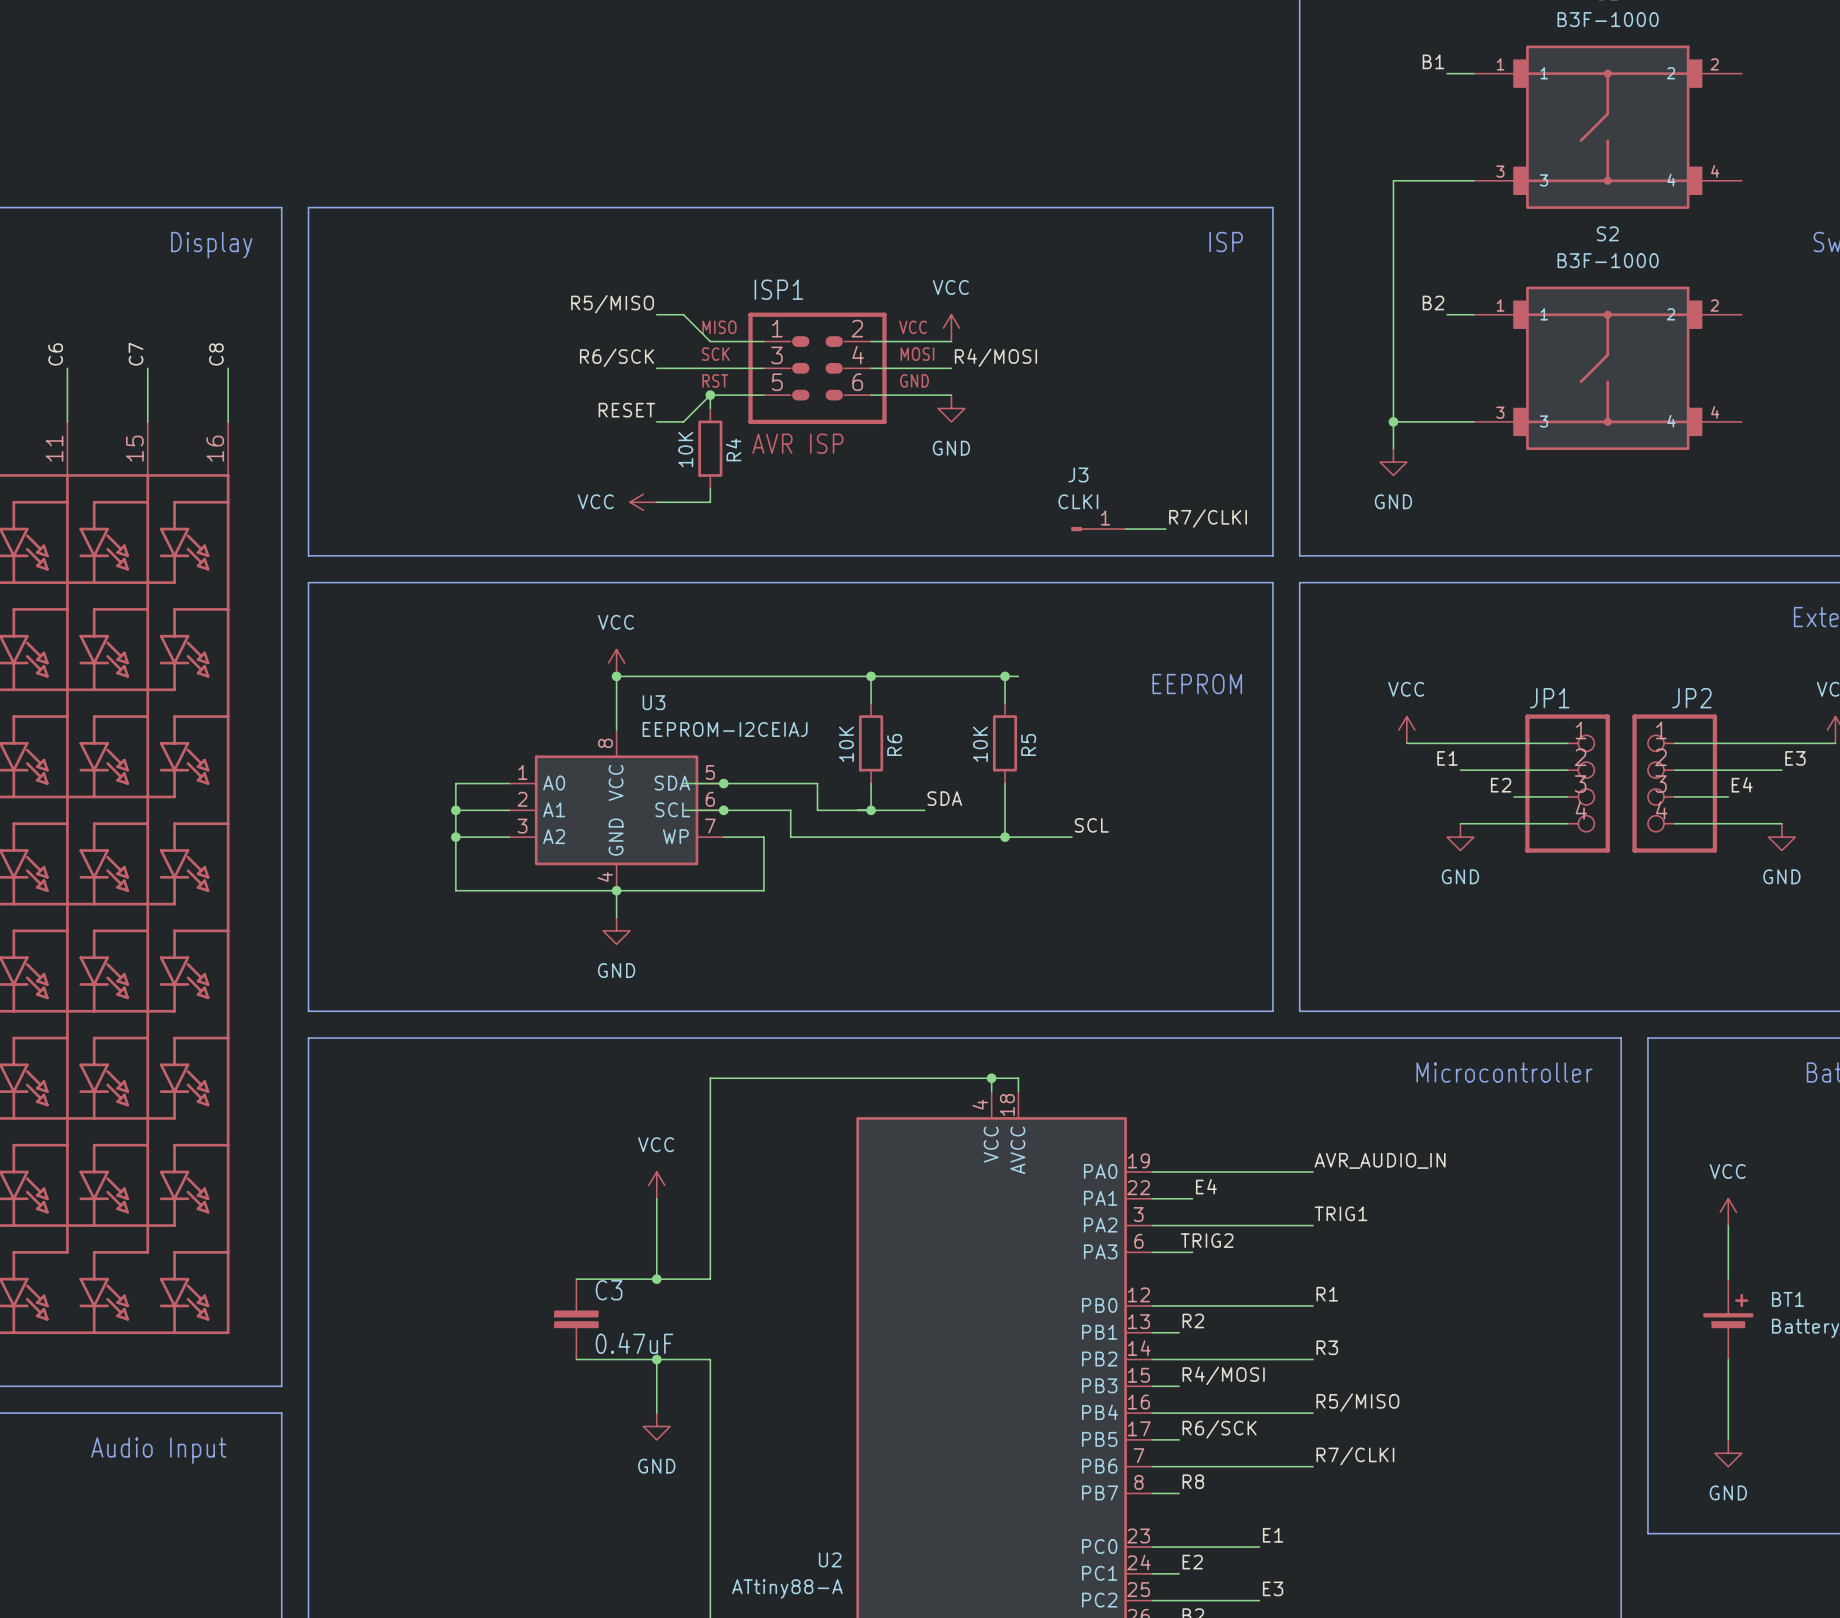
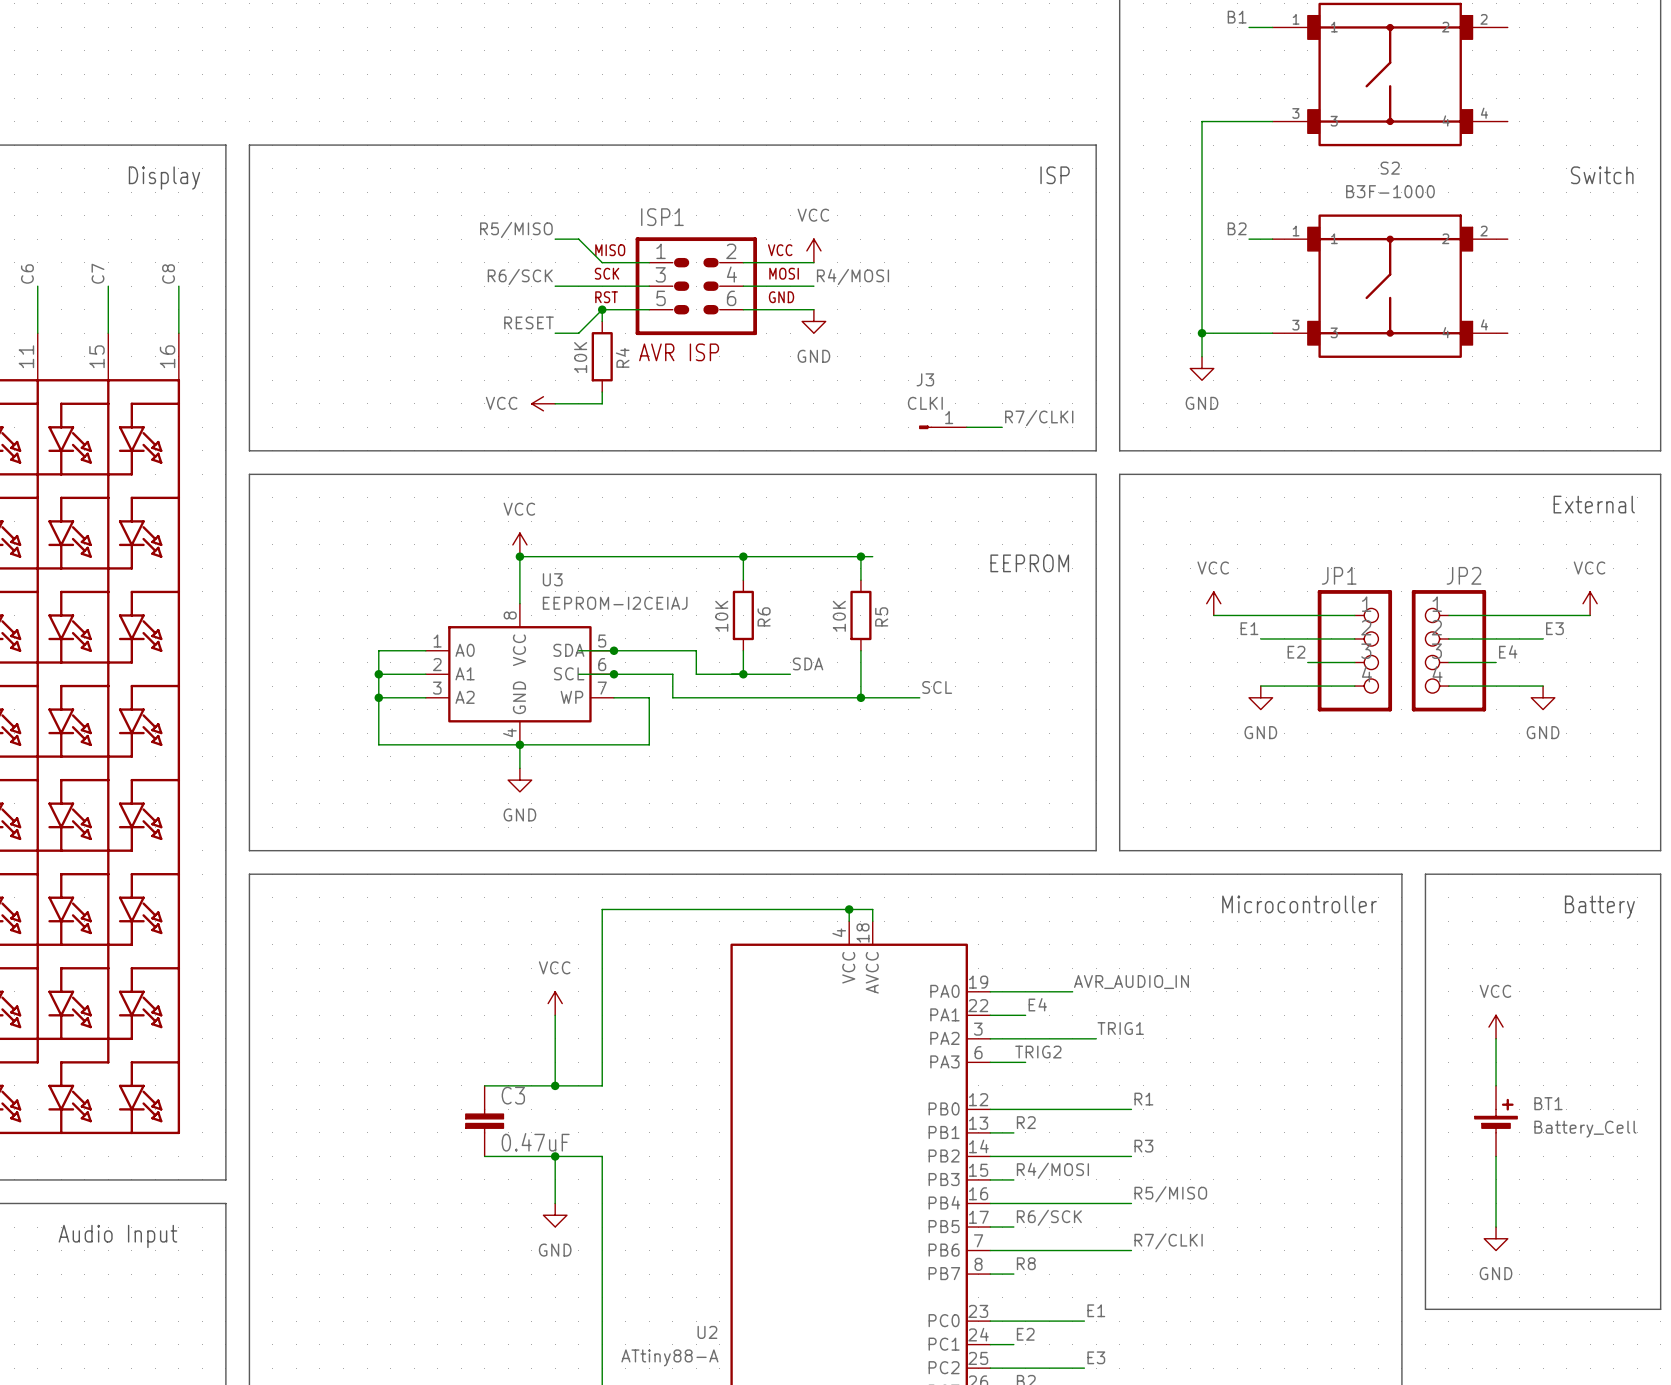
label position: AVR_AUDIO_IN (1380, 1160) -> AVR_AUDIO_IN (1131, 982)
wire: (1246, 1171) (1313, 1171) -> none
label position: TRIG1 (1341, 1213) -> TRIG1 (1120, 1028)
wire: (1272, 1225) (1313, 1225) -> none

